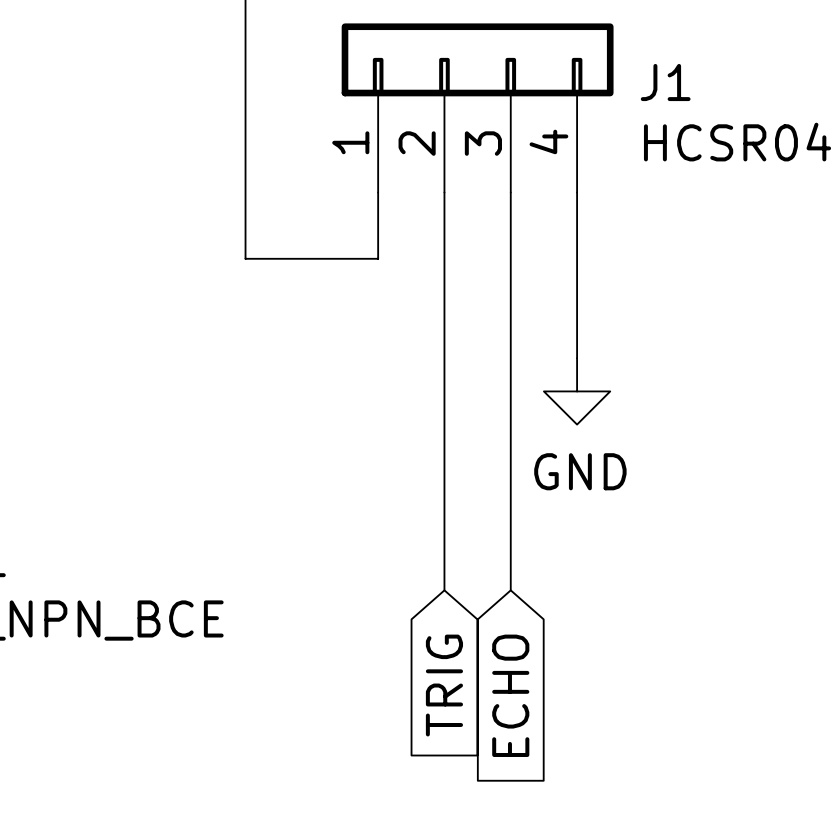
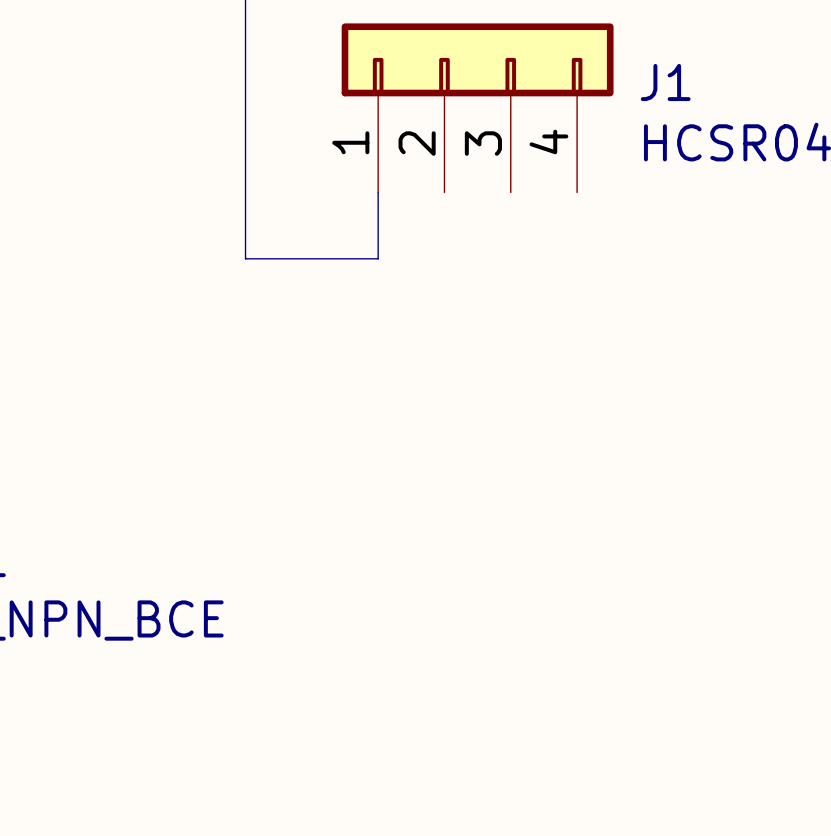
wire: (444, 192) (444, 590) -> none
wire: (510, 192) (510, 590) -> none
wire: (577, 192) (577, 358) -> none
power symbol: GND (577, 391) -> none
global label: TRIG (444, 685) -> none
global label: ECHO (510, 695) -> none

